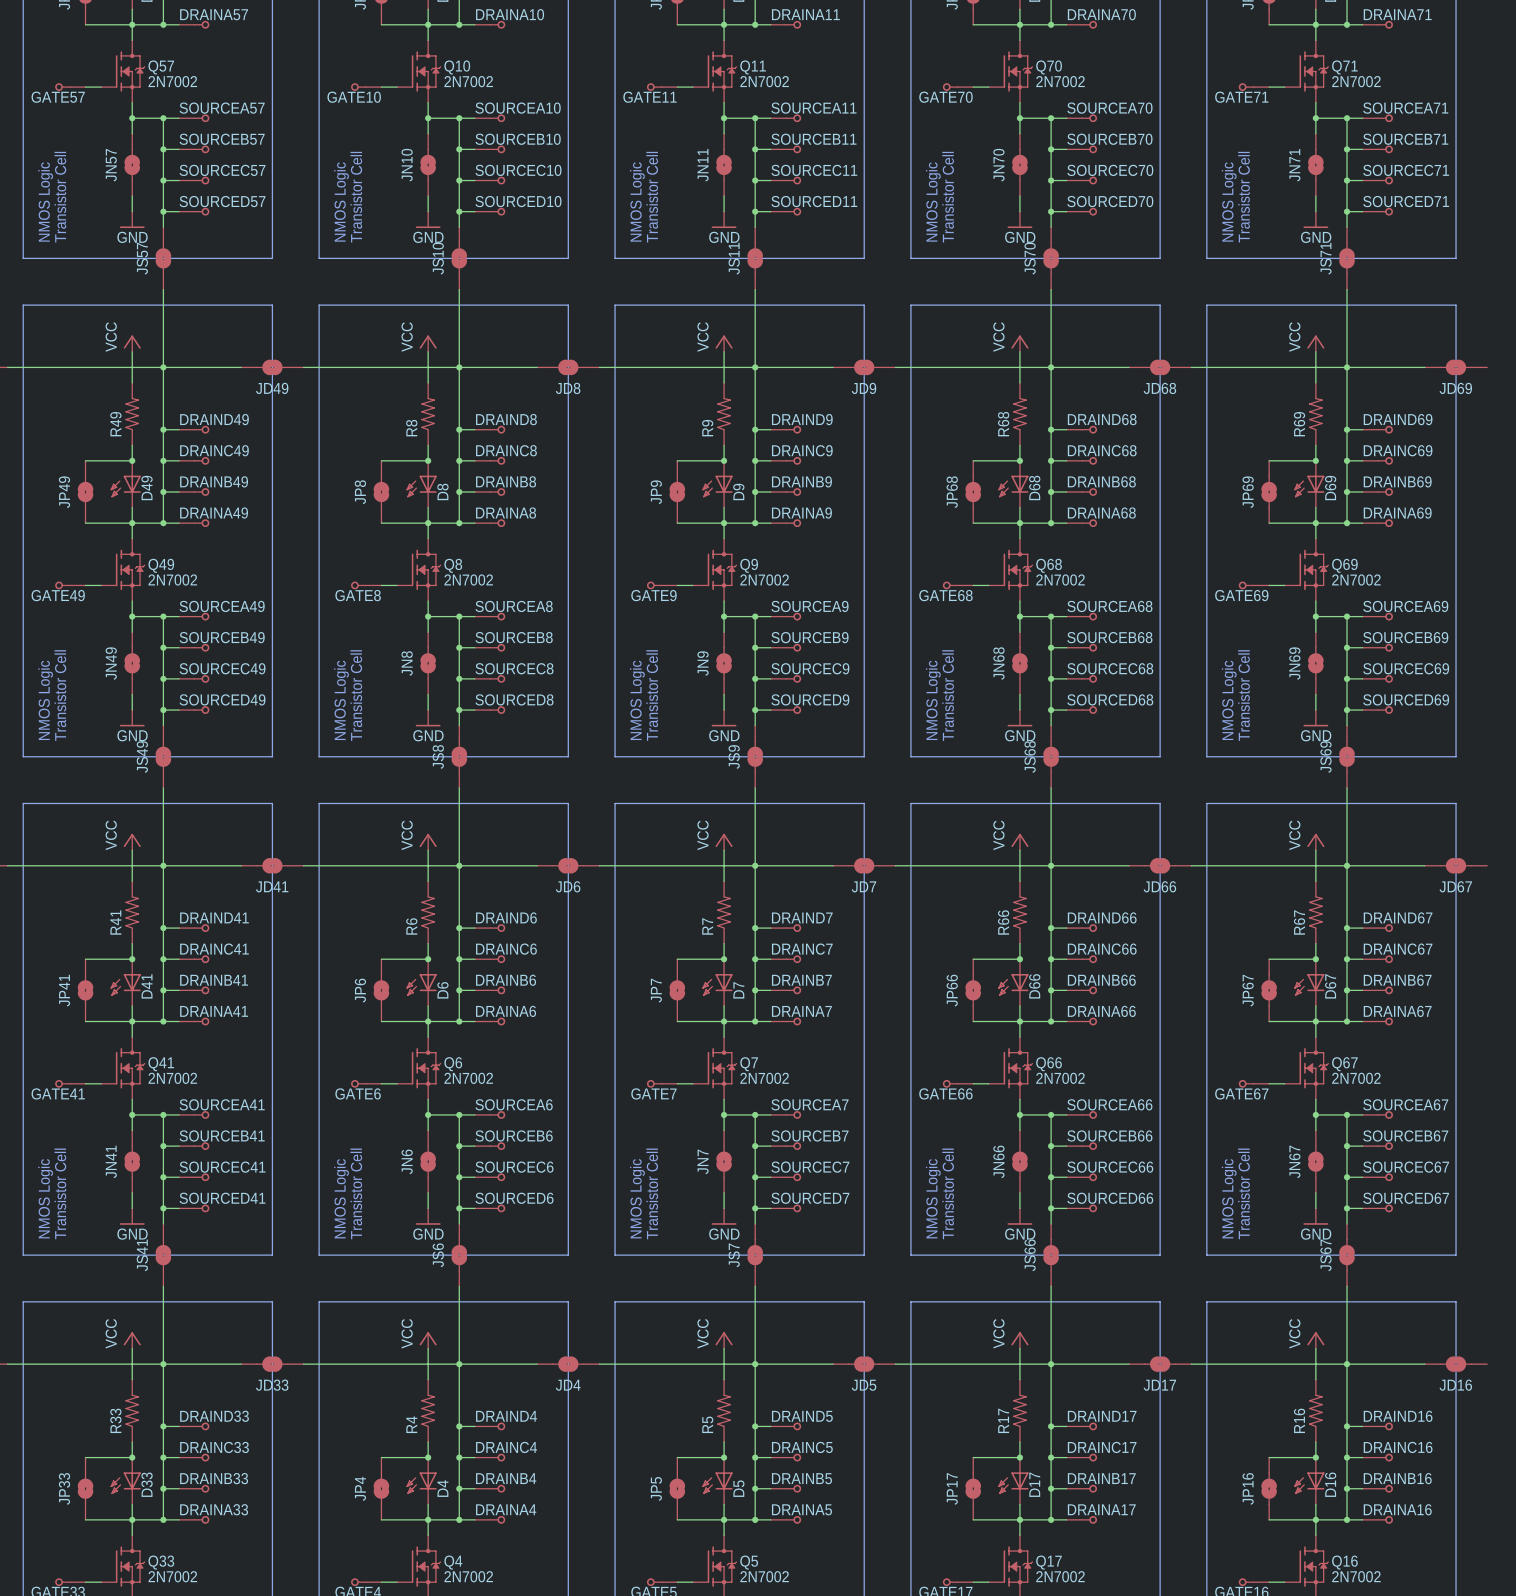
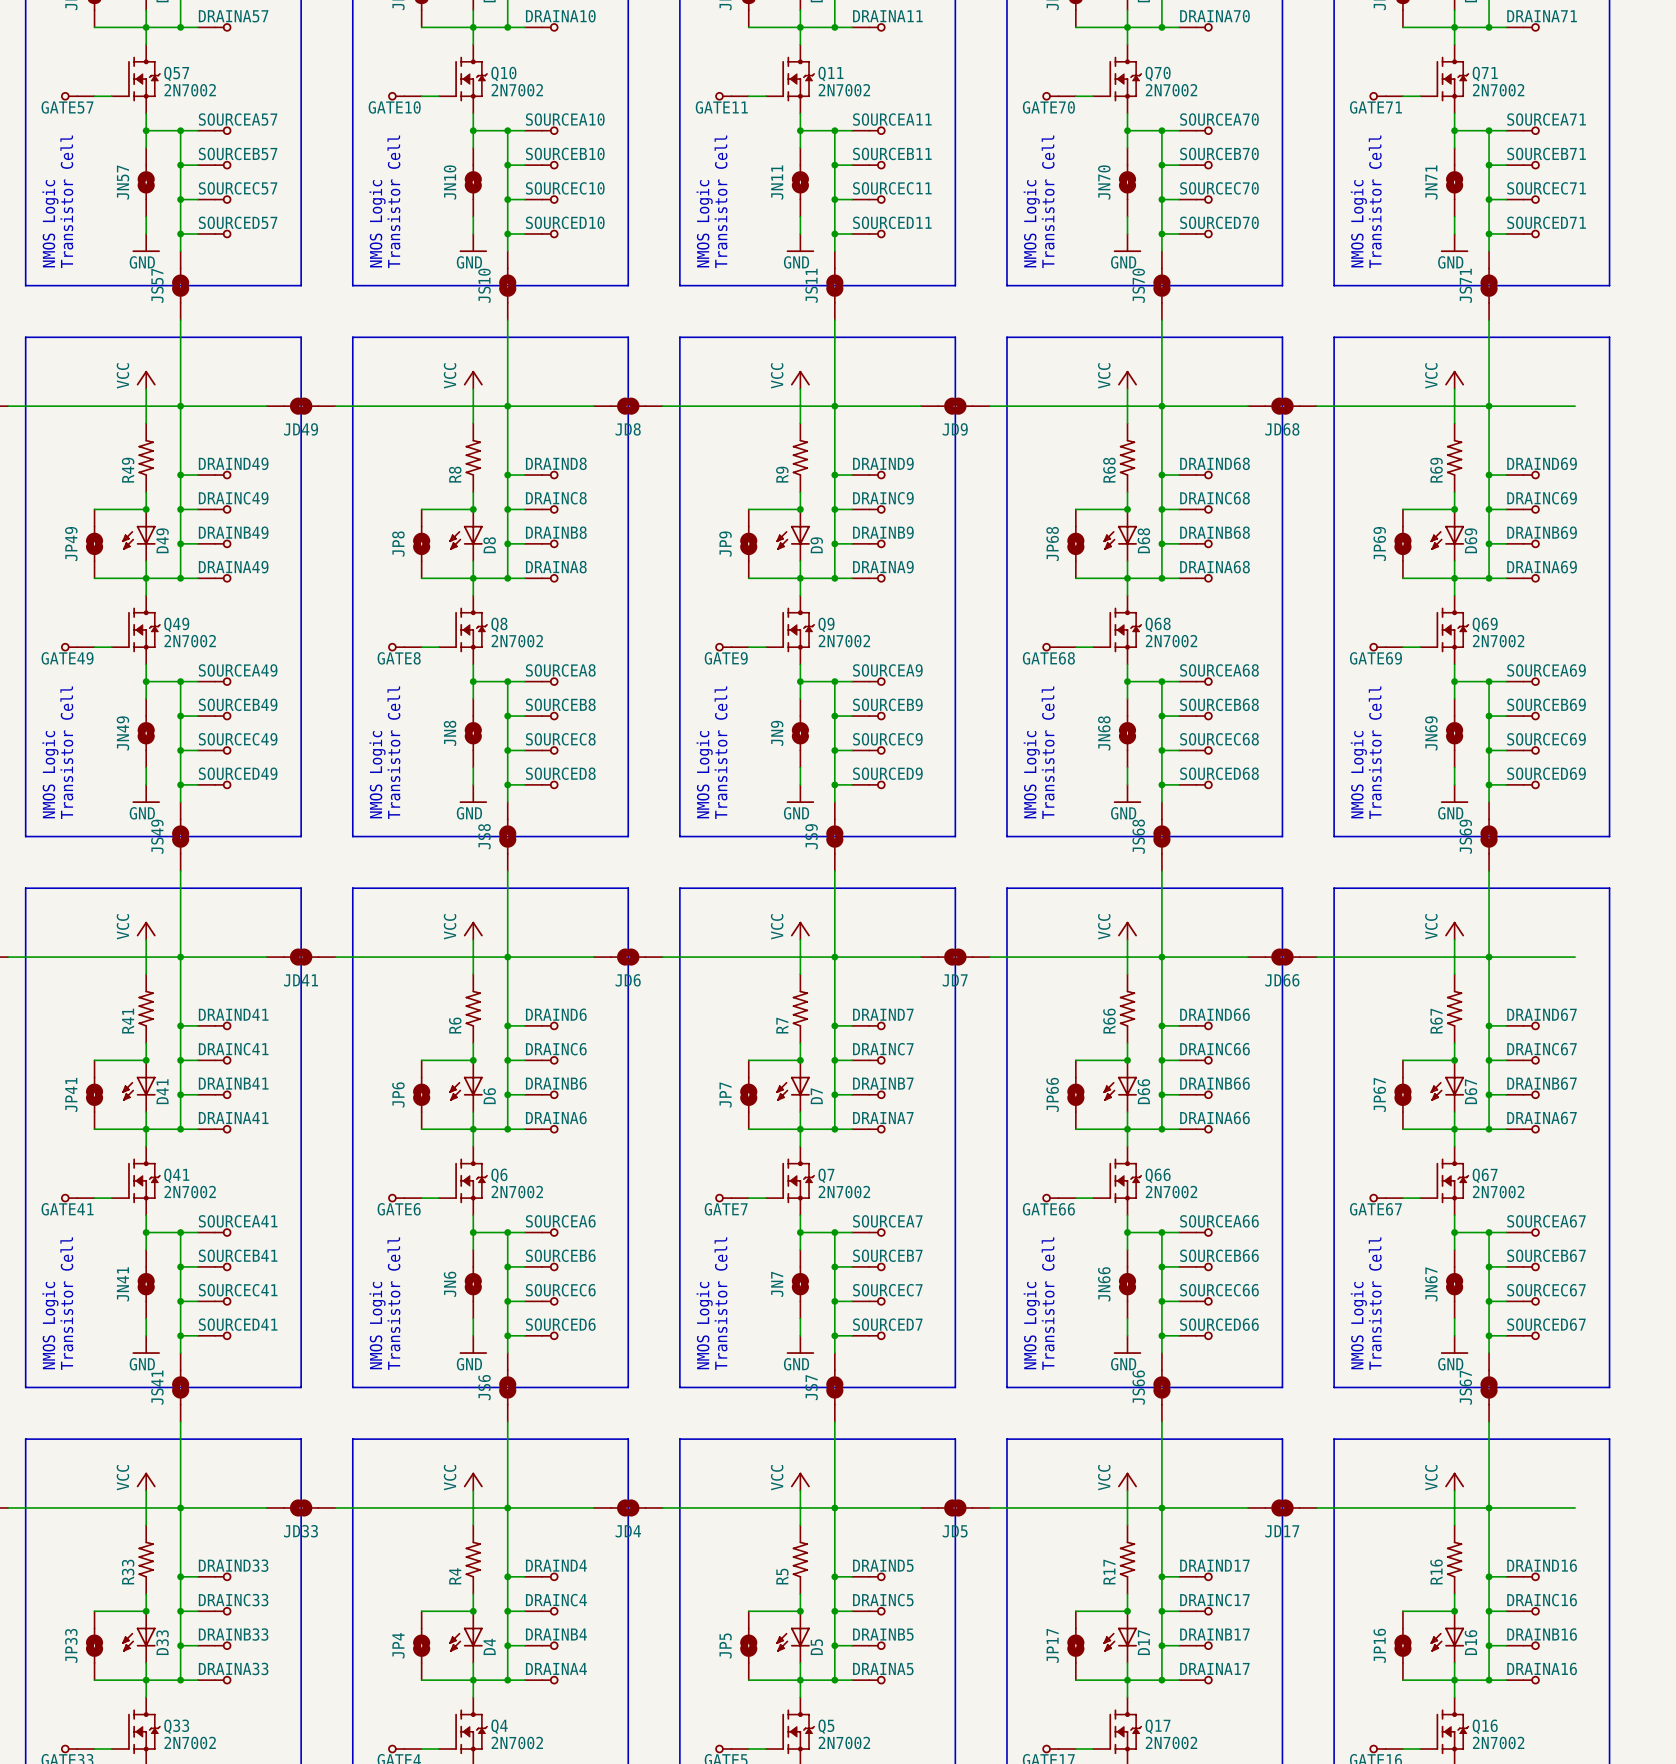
JD69: (1456, 367) -> none
JD67: (1456, 865) -> none
JD16: (1456, 1364) -> none

